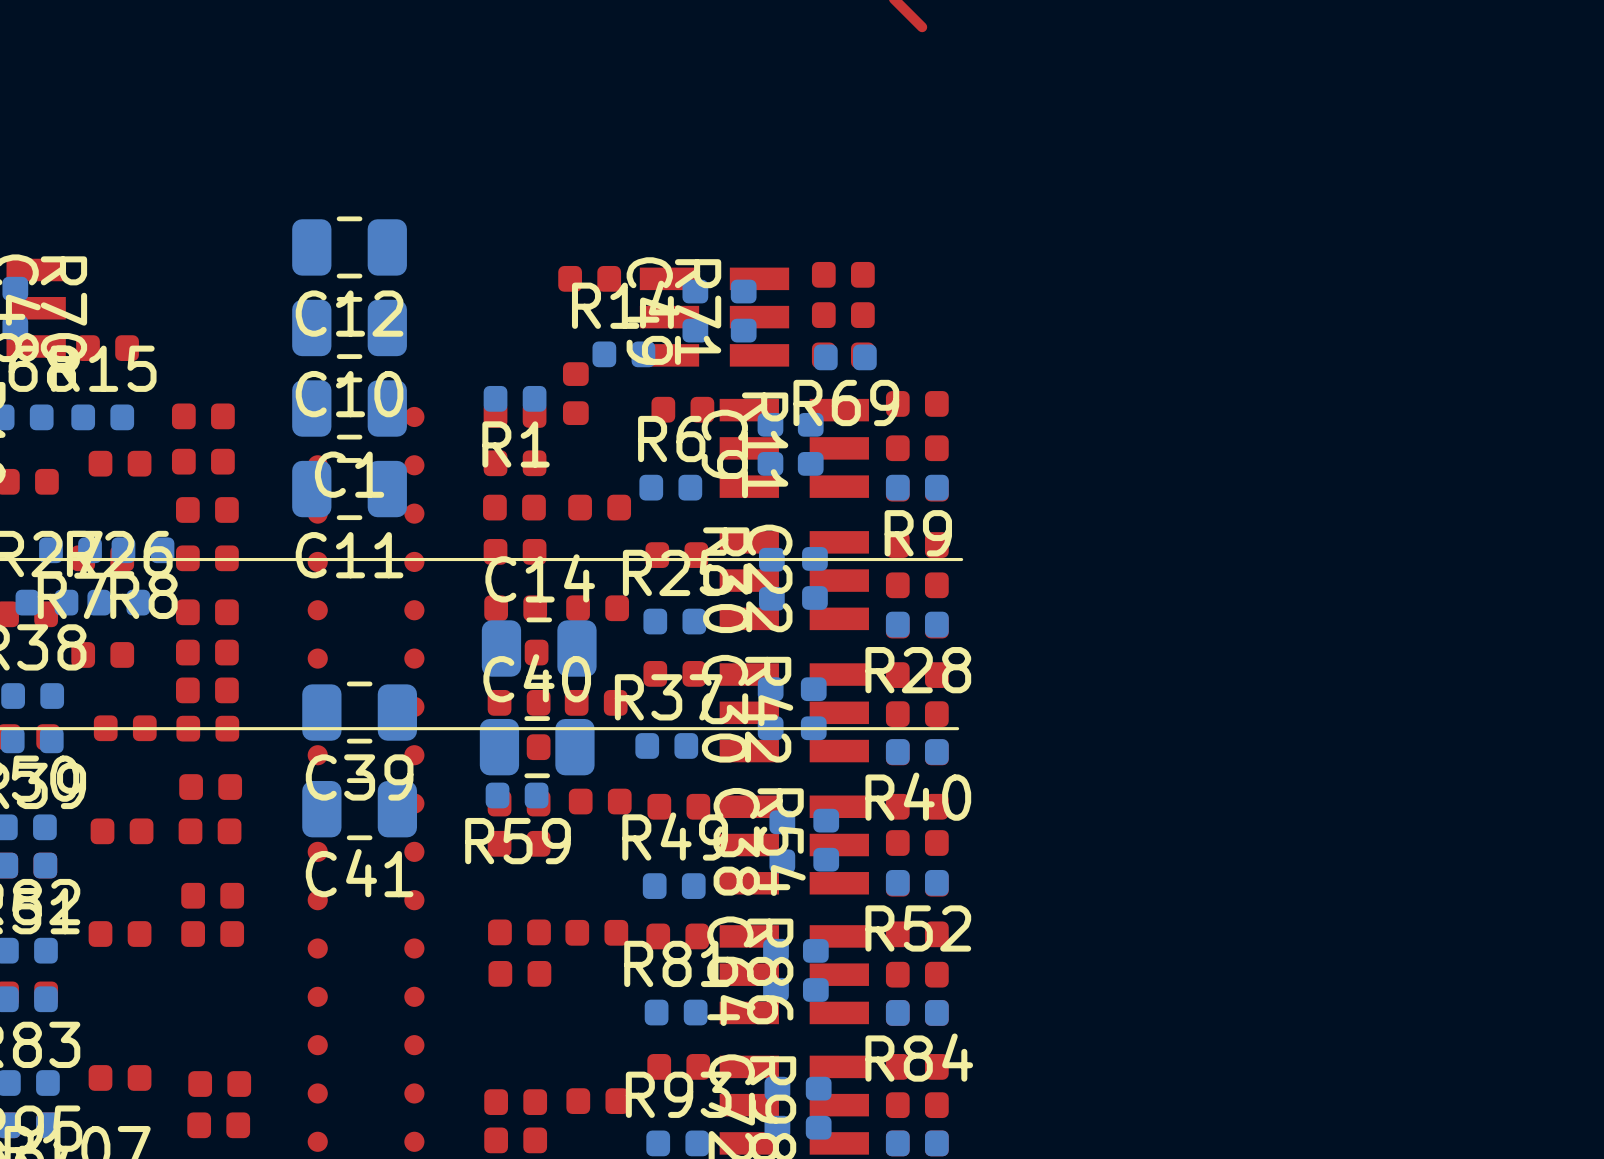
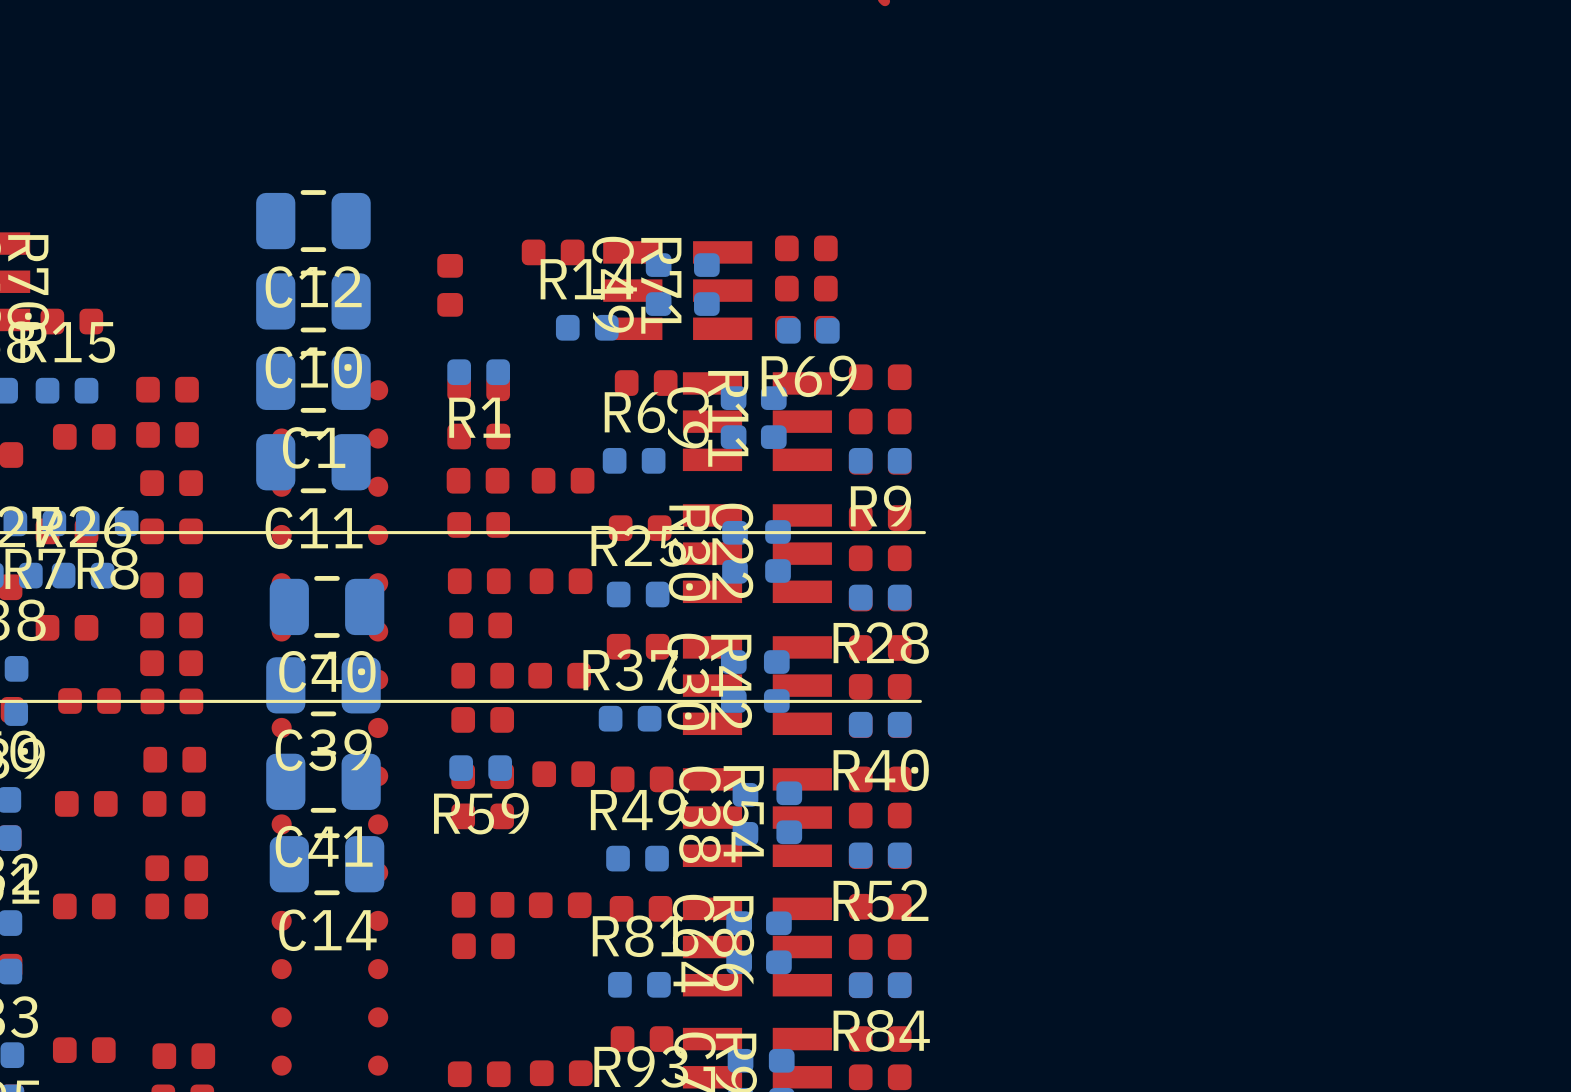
part position: (575, 393) -> (450, 285)
C14 name position: C14 (540, 578) -> C14 (327, 930)
C14 position: (539, 648) -> (327, 864)
C40 name position: C40 (537, 678) -> C40 (327, 671)
C40 position: (537, 747) -> (327, 606)

